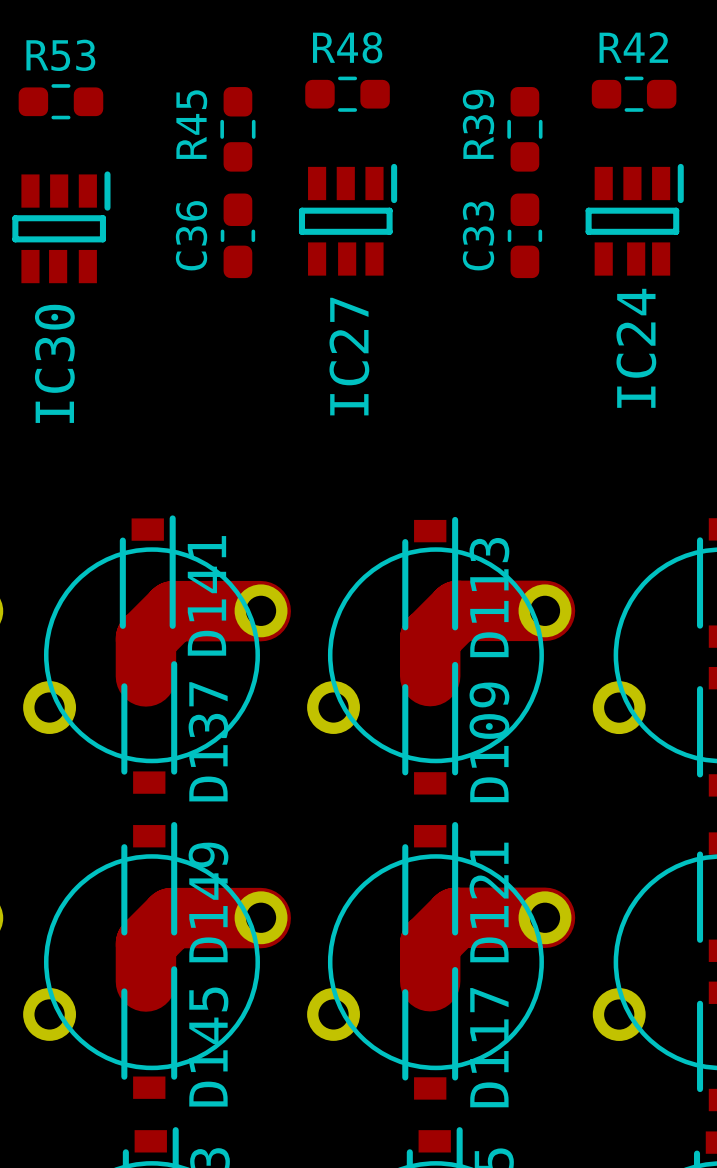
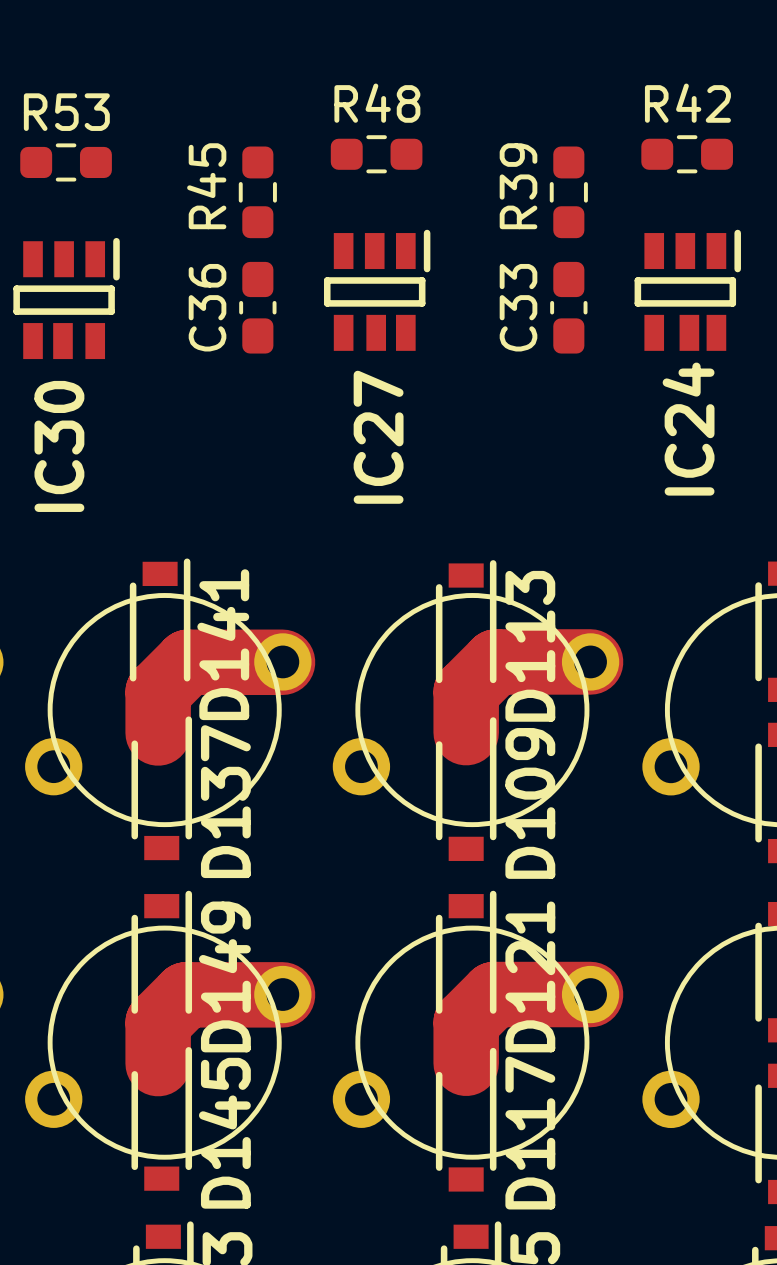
R48 position: (347, 94) -> (376, 154)
R42 position: (634, 94) -> (687, 154)
R53 position: (60, 101) -> (66, 162)
R45 position: (237, 129) -> (257, 192)
R39 position: (524, 129) -> (568, 192)
IC27 position: (348, 219) -> (377, 290)
IC24 position: (634, 219) -> (687, 290)
IC30 position: (61, 227) -> (66, 298)
C36 position: (237, 235) -> (257, 307)
C33 position: (524, 235) -> (568, 307)

